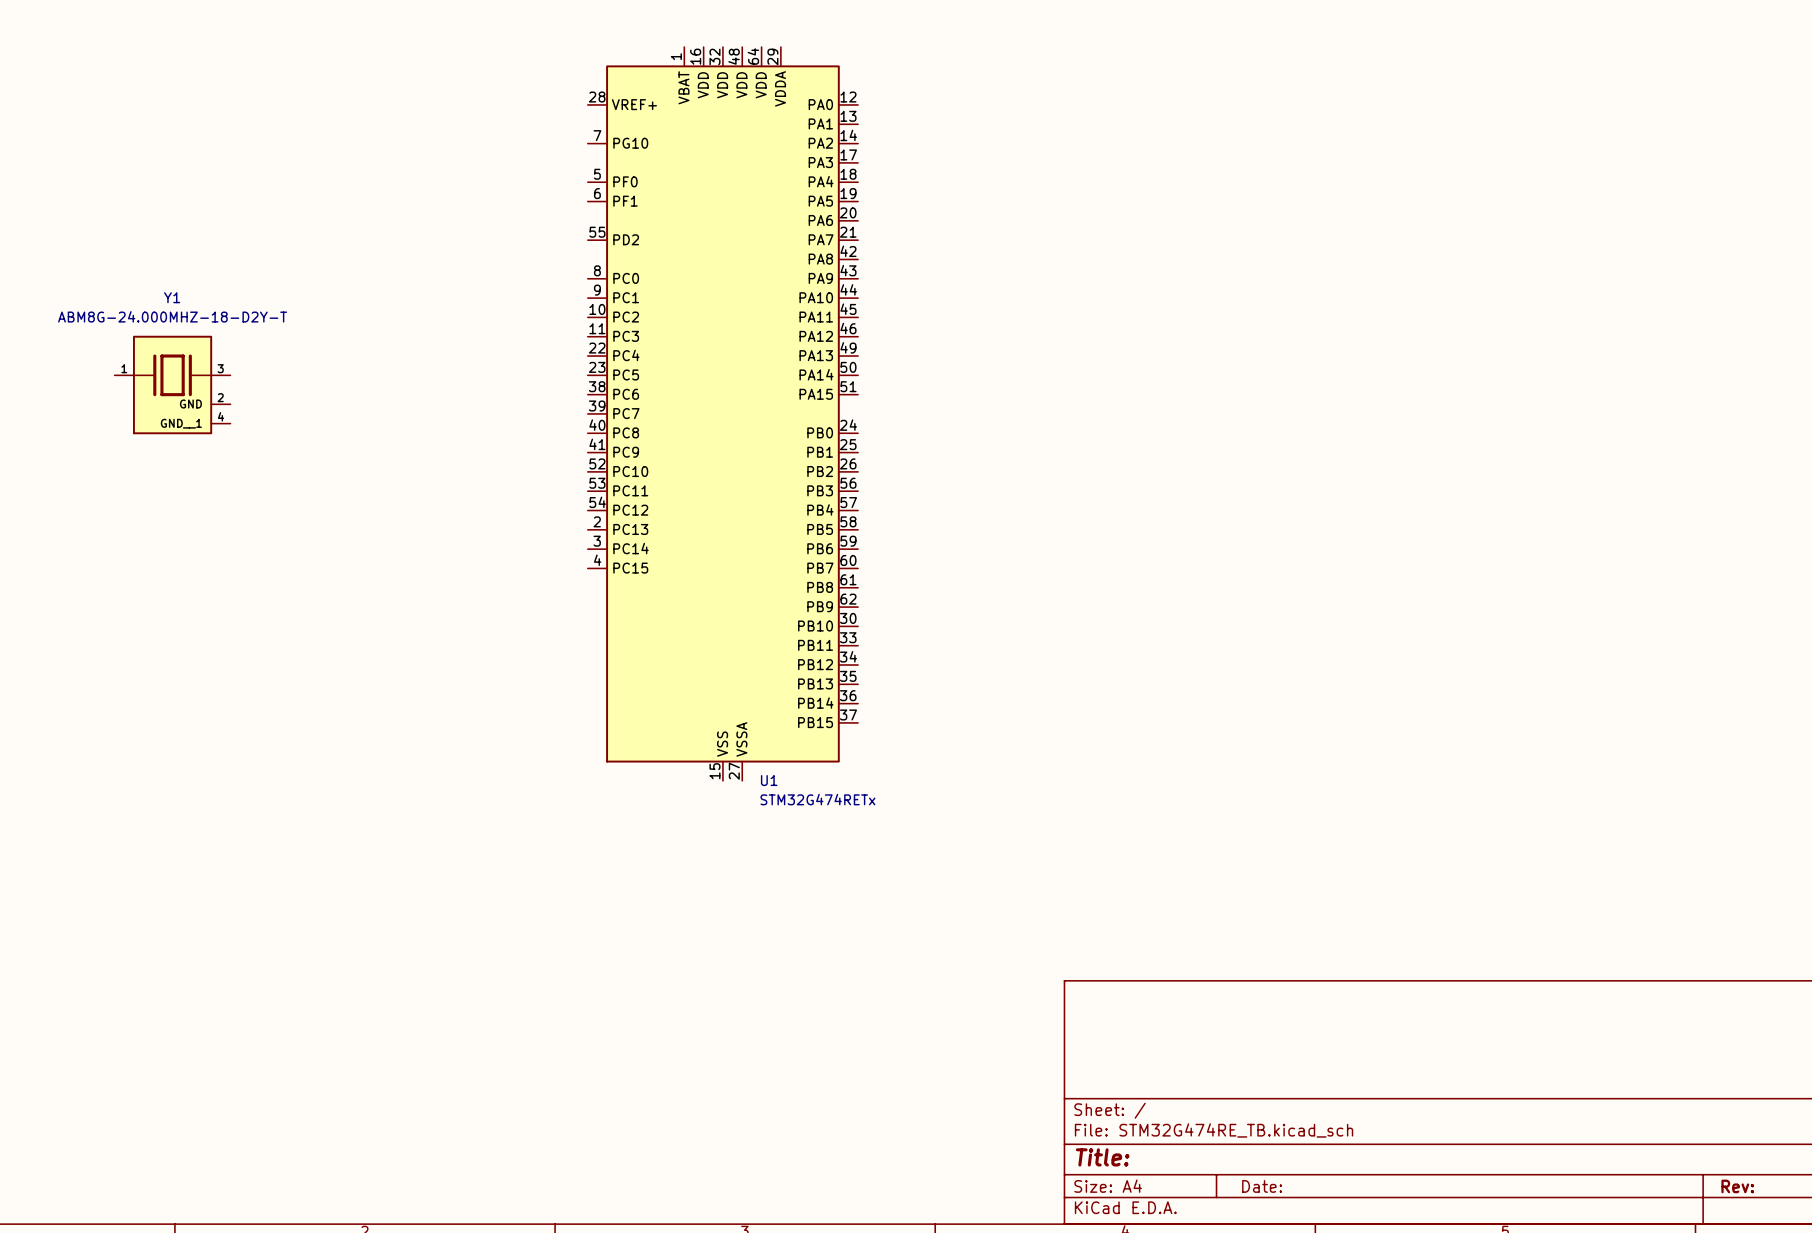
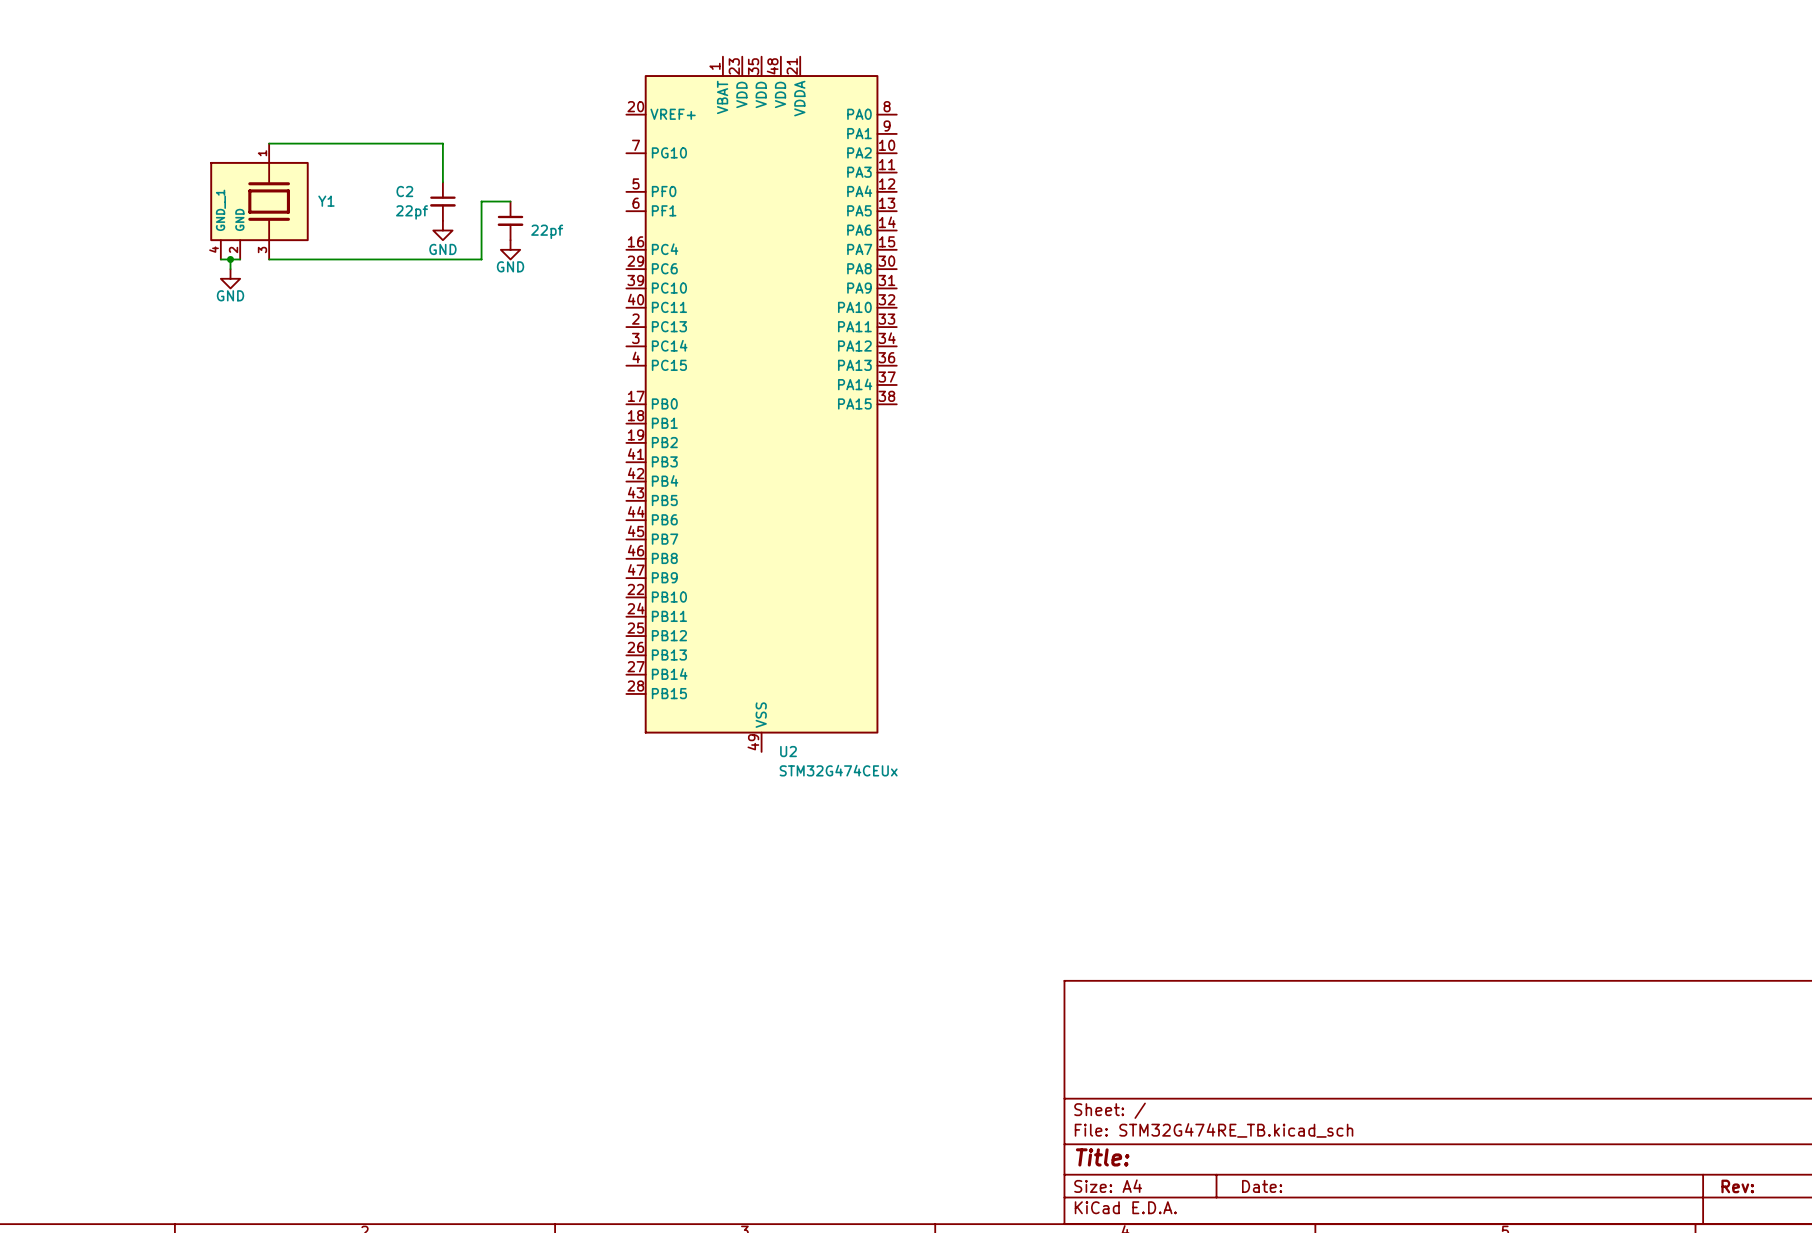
wire: none -> (269, 143) (442, 143) (442, 182)
C2: none -> 22pf (442, 201)
wire: none -> (510, 201) (481, 201) (481, 259) (269, 259)
part: none -> 22pf (510, 220)
power symbol: none -> GND (442, 230)
power symbol: none -> GND (510, 249)
wire: none -> (220, 259) (240, 259)
wire: none -> (230, 259) (230, 269)
junction: none -> (230, 259)
power symbol: none -> GND (230, 278)
Y1 name position: Y1 (172, 297) -> Y1 (326, 201)
Y1 value: ABM8G-24.000MHZ-18-D2Y-T (172, 316) -> none
Y1 rotation: 0° (172, 384) -> 90° clockwise (259, 201)
Y1 position: (172, 384) -> (259, 201)
U2: none -> STM32G474CEUx (761, 404)
U1: STM32G474RETx (722, 413) -> none

